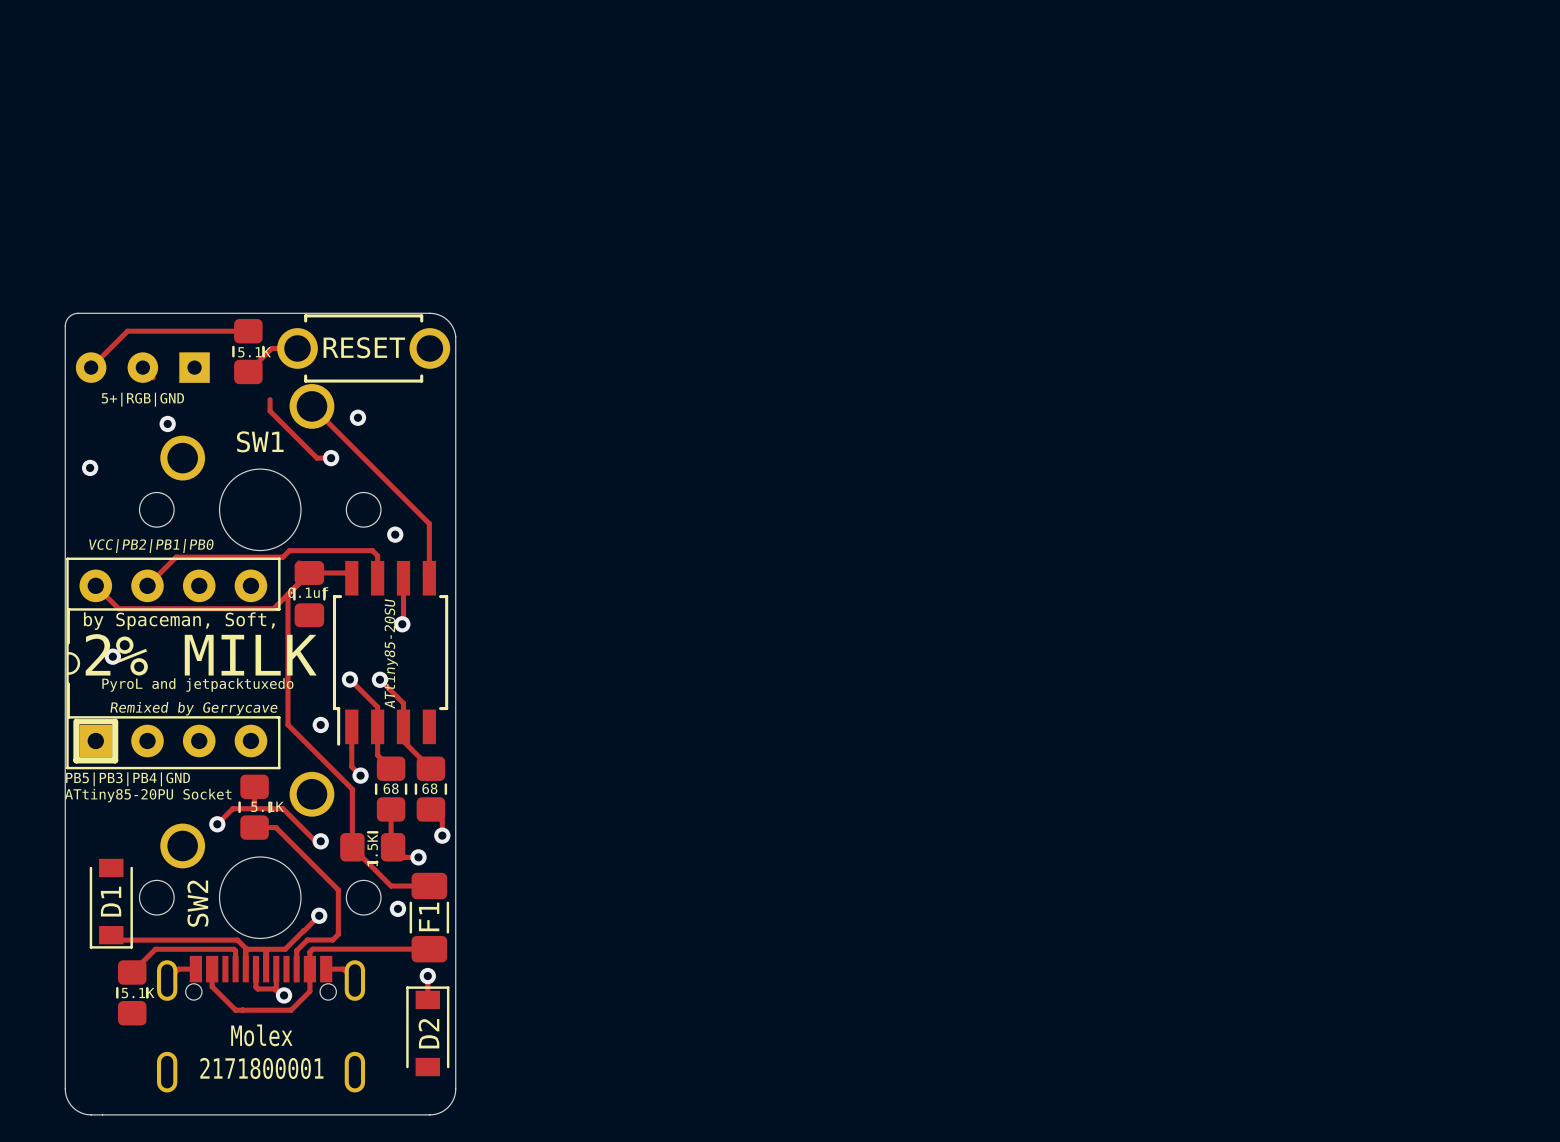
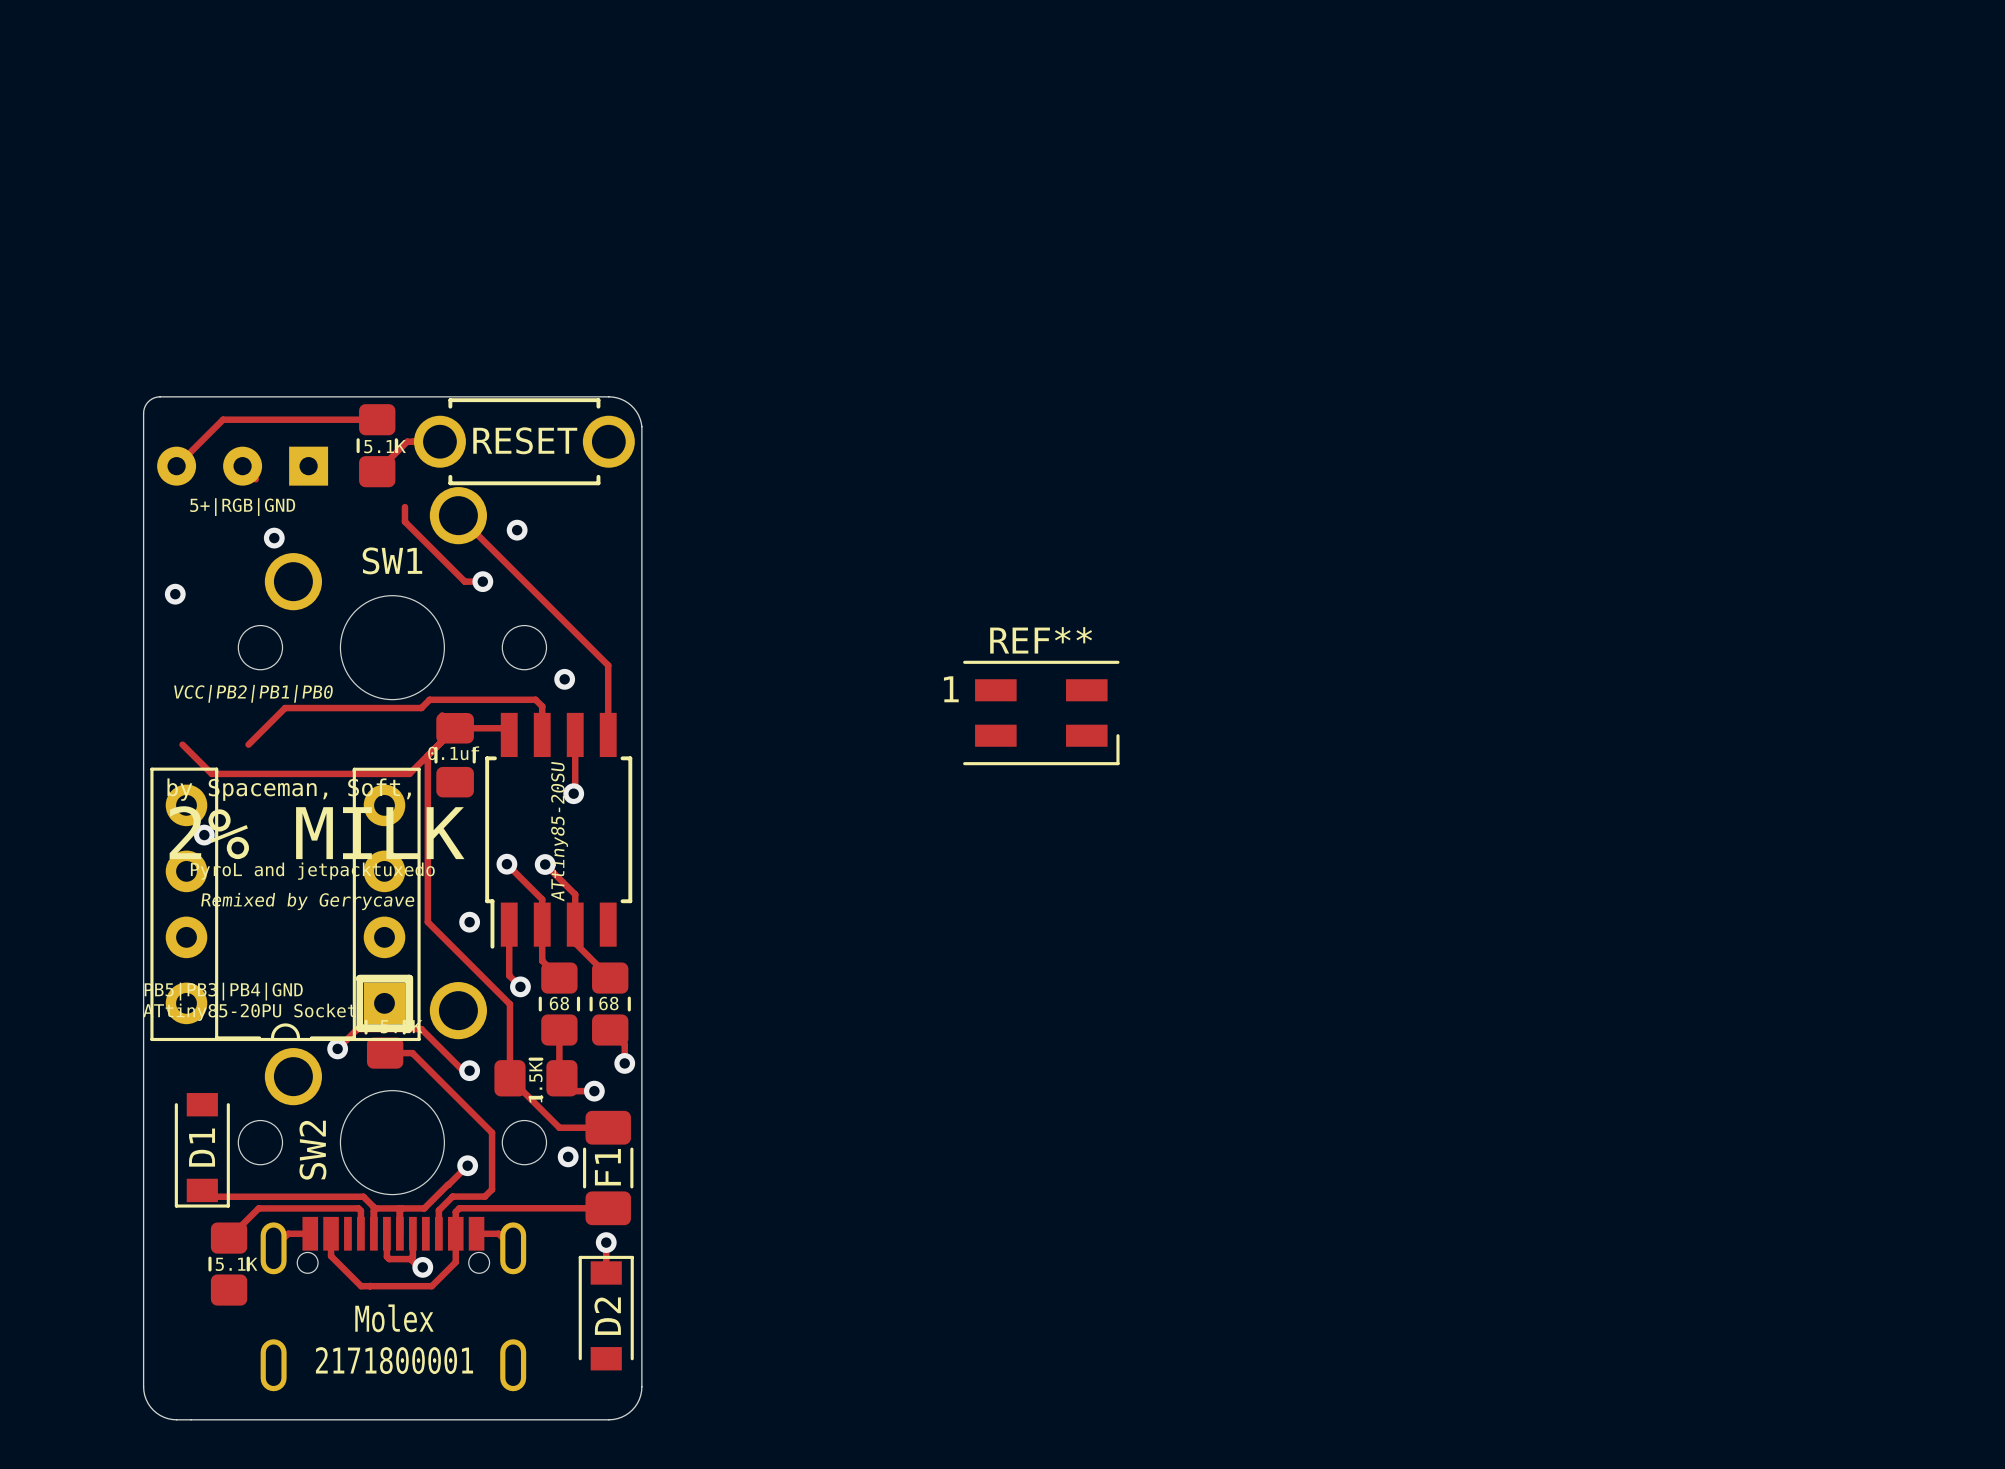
REF**: none -> (1041, 712)
part rotation: 0° (173, 663) -> 90° counterclockwise (285, 904)

